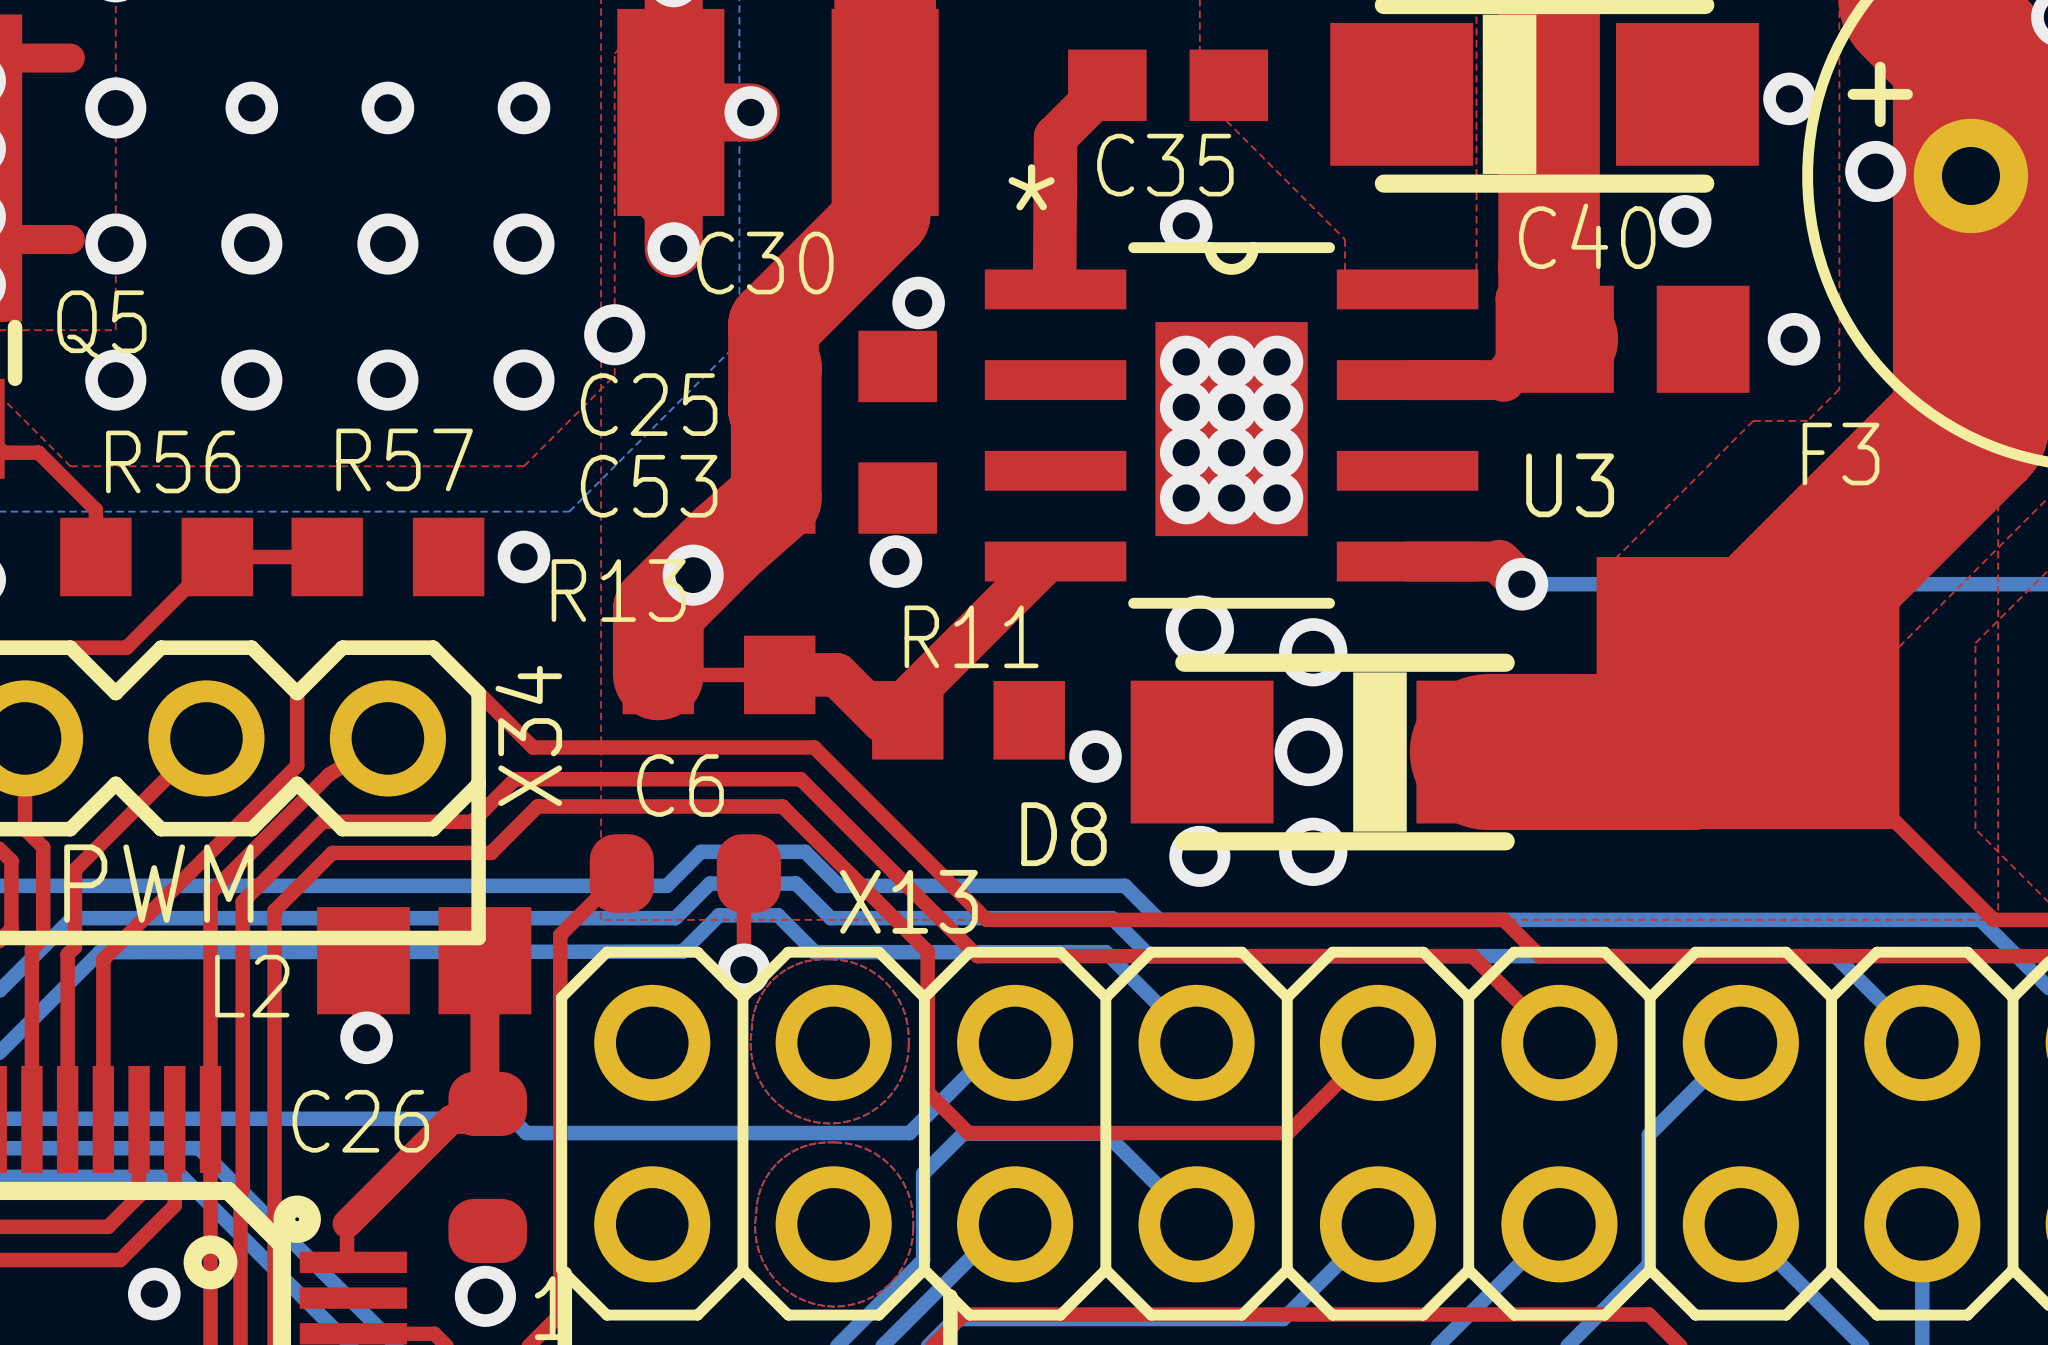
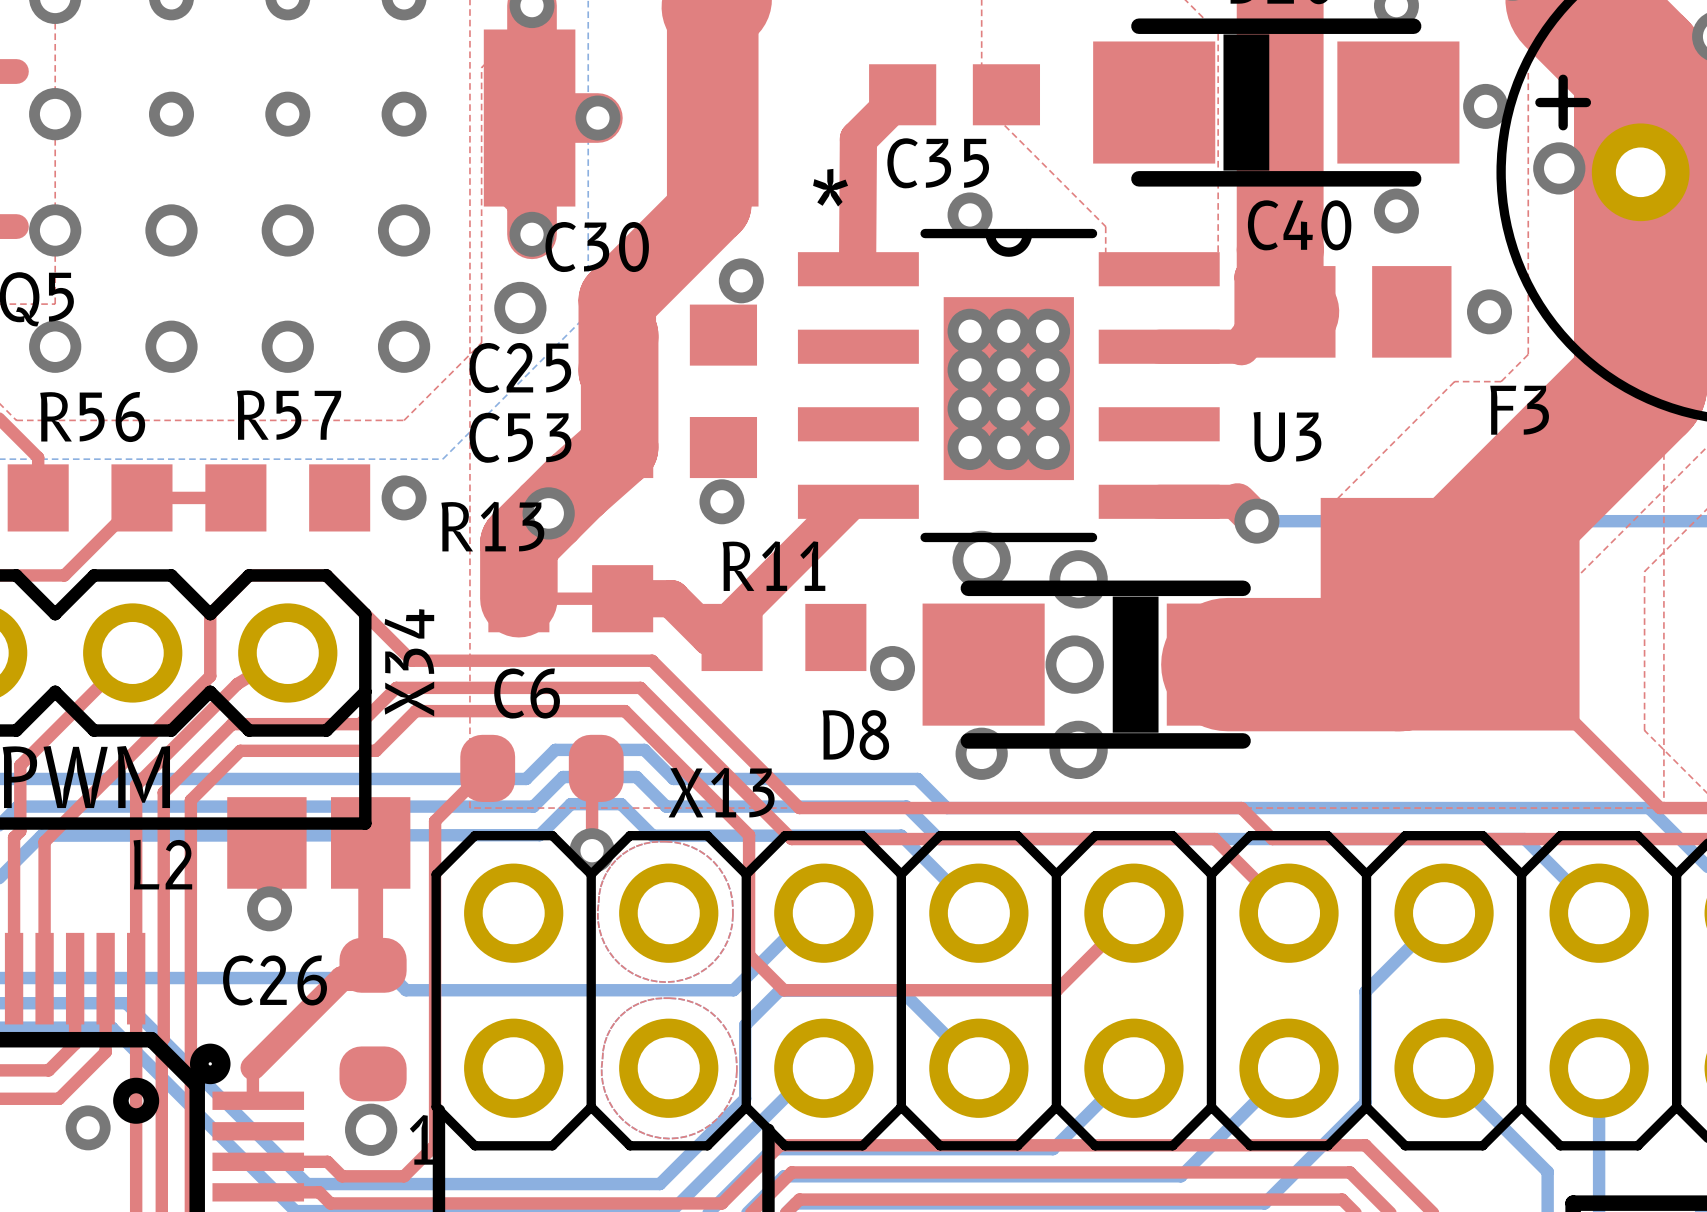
via position: (614, 334) -> (520, 307)

